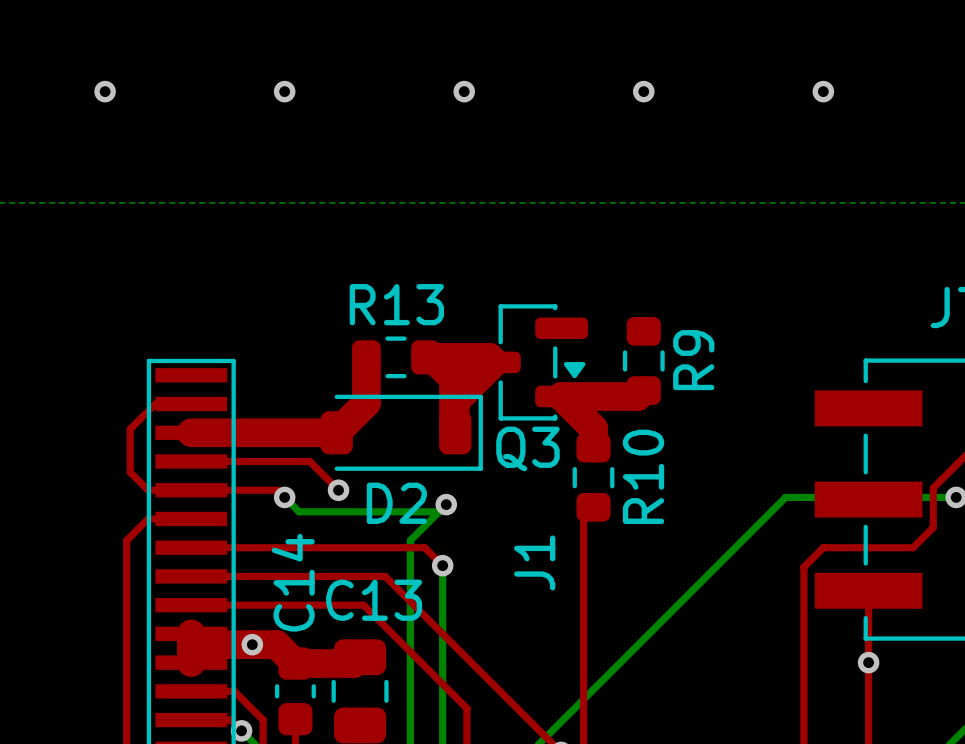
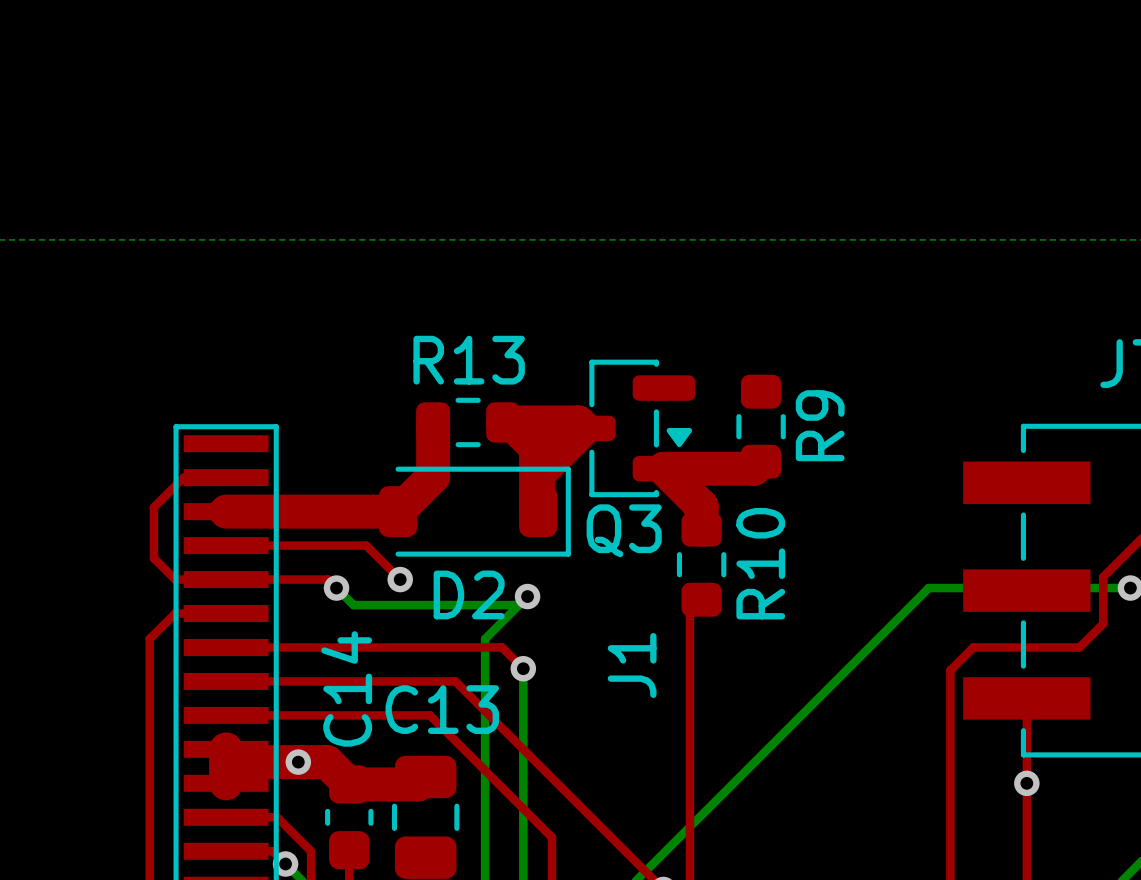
via: (105, 91) -> none
via: (284, 91) -> none
via: (464, 91) -> none
via: (643, 91) -> none
via: (823, 91) -> none

